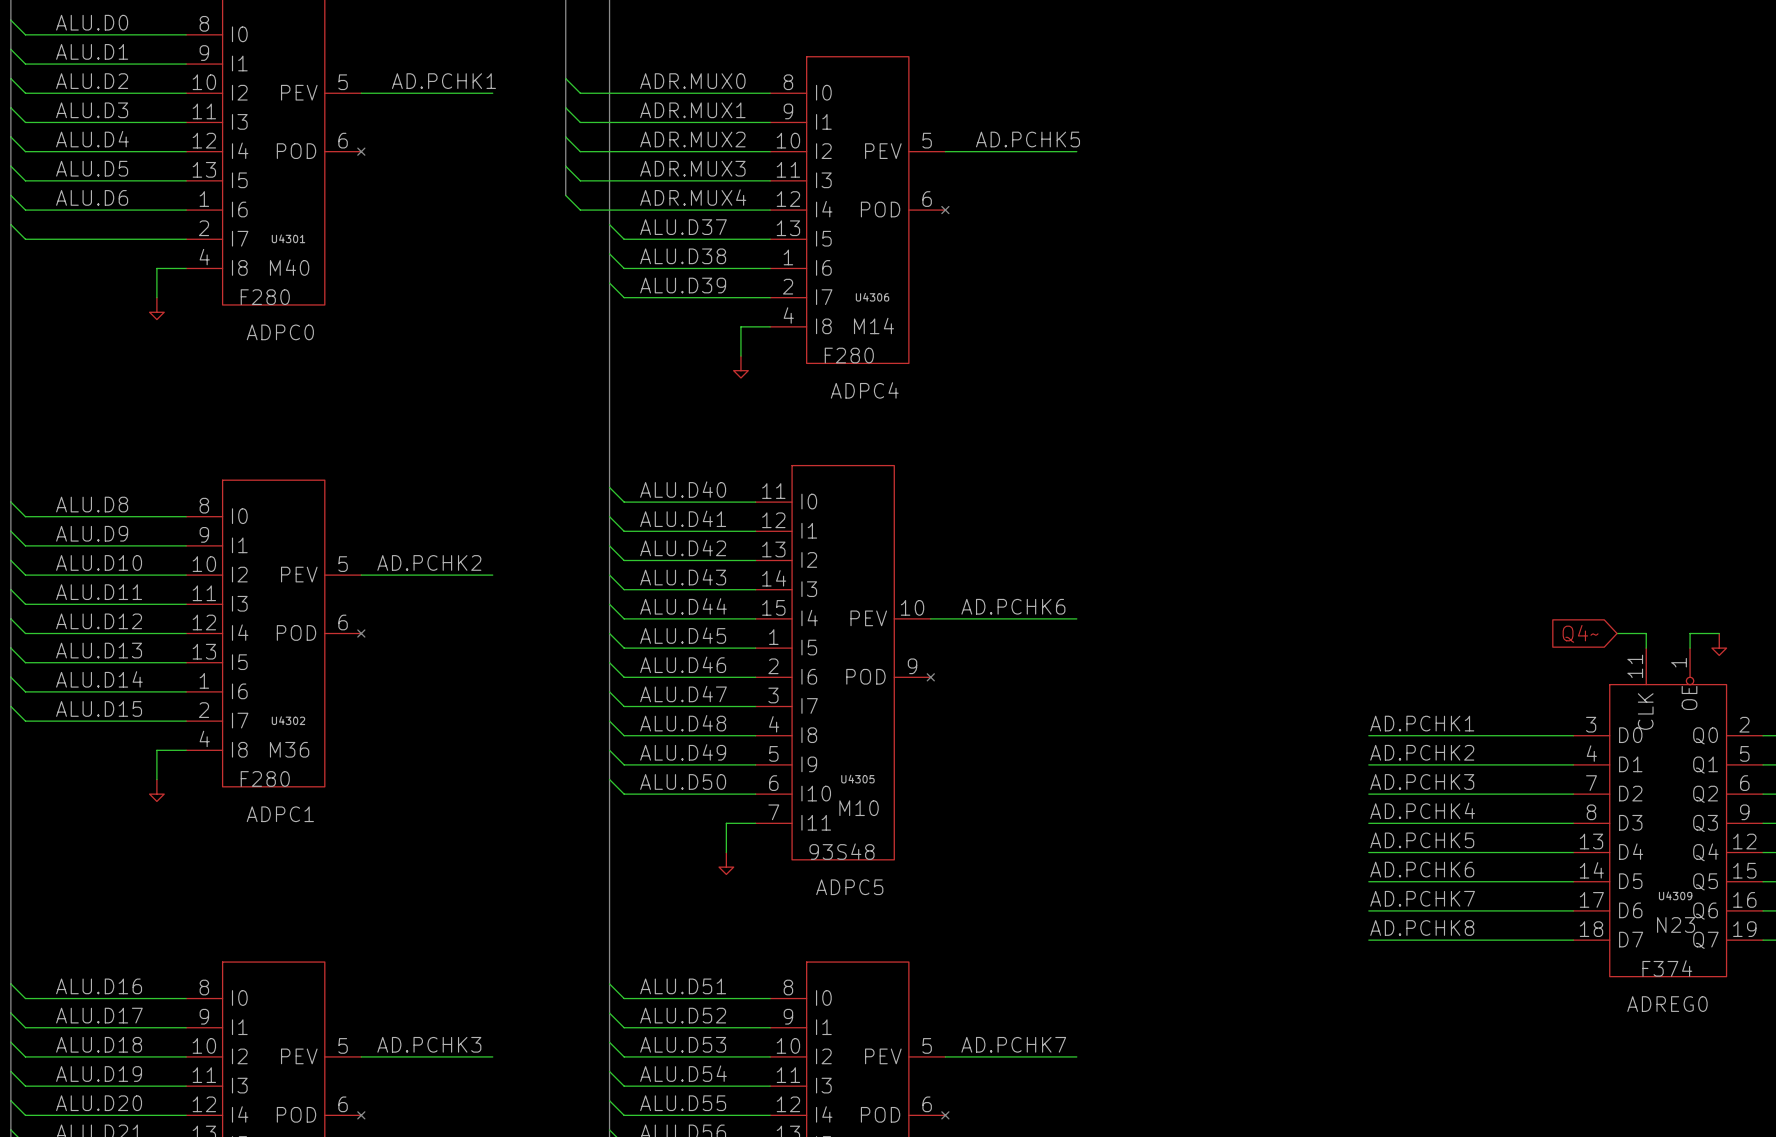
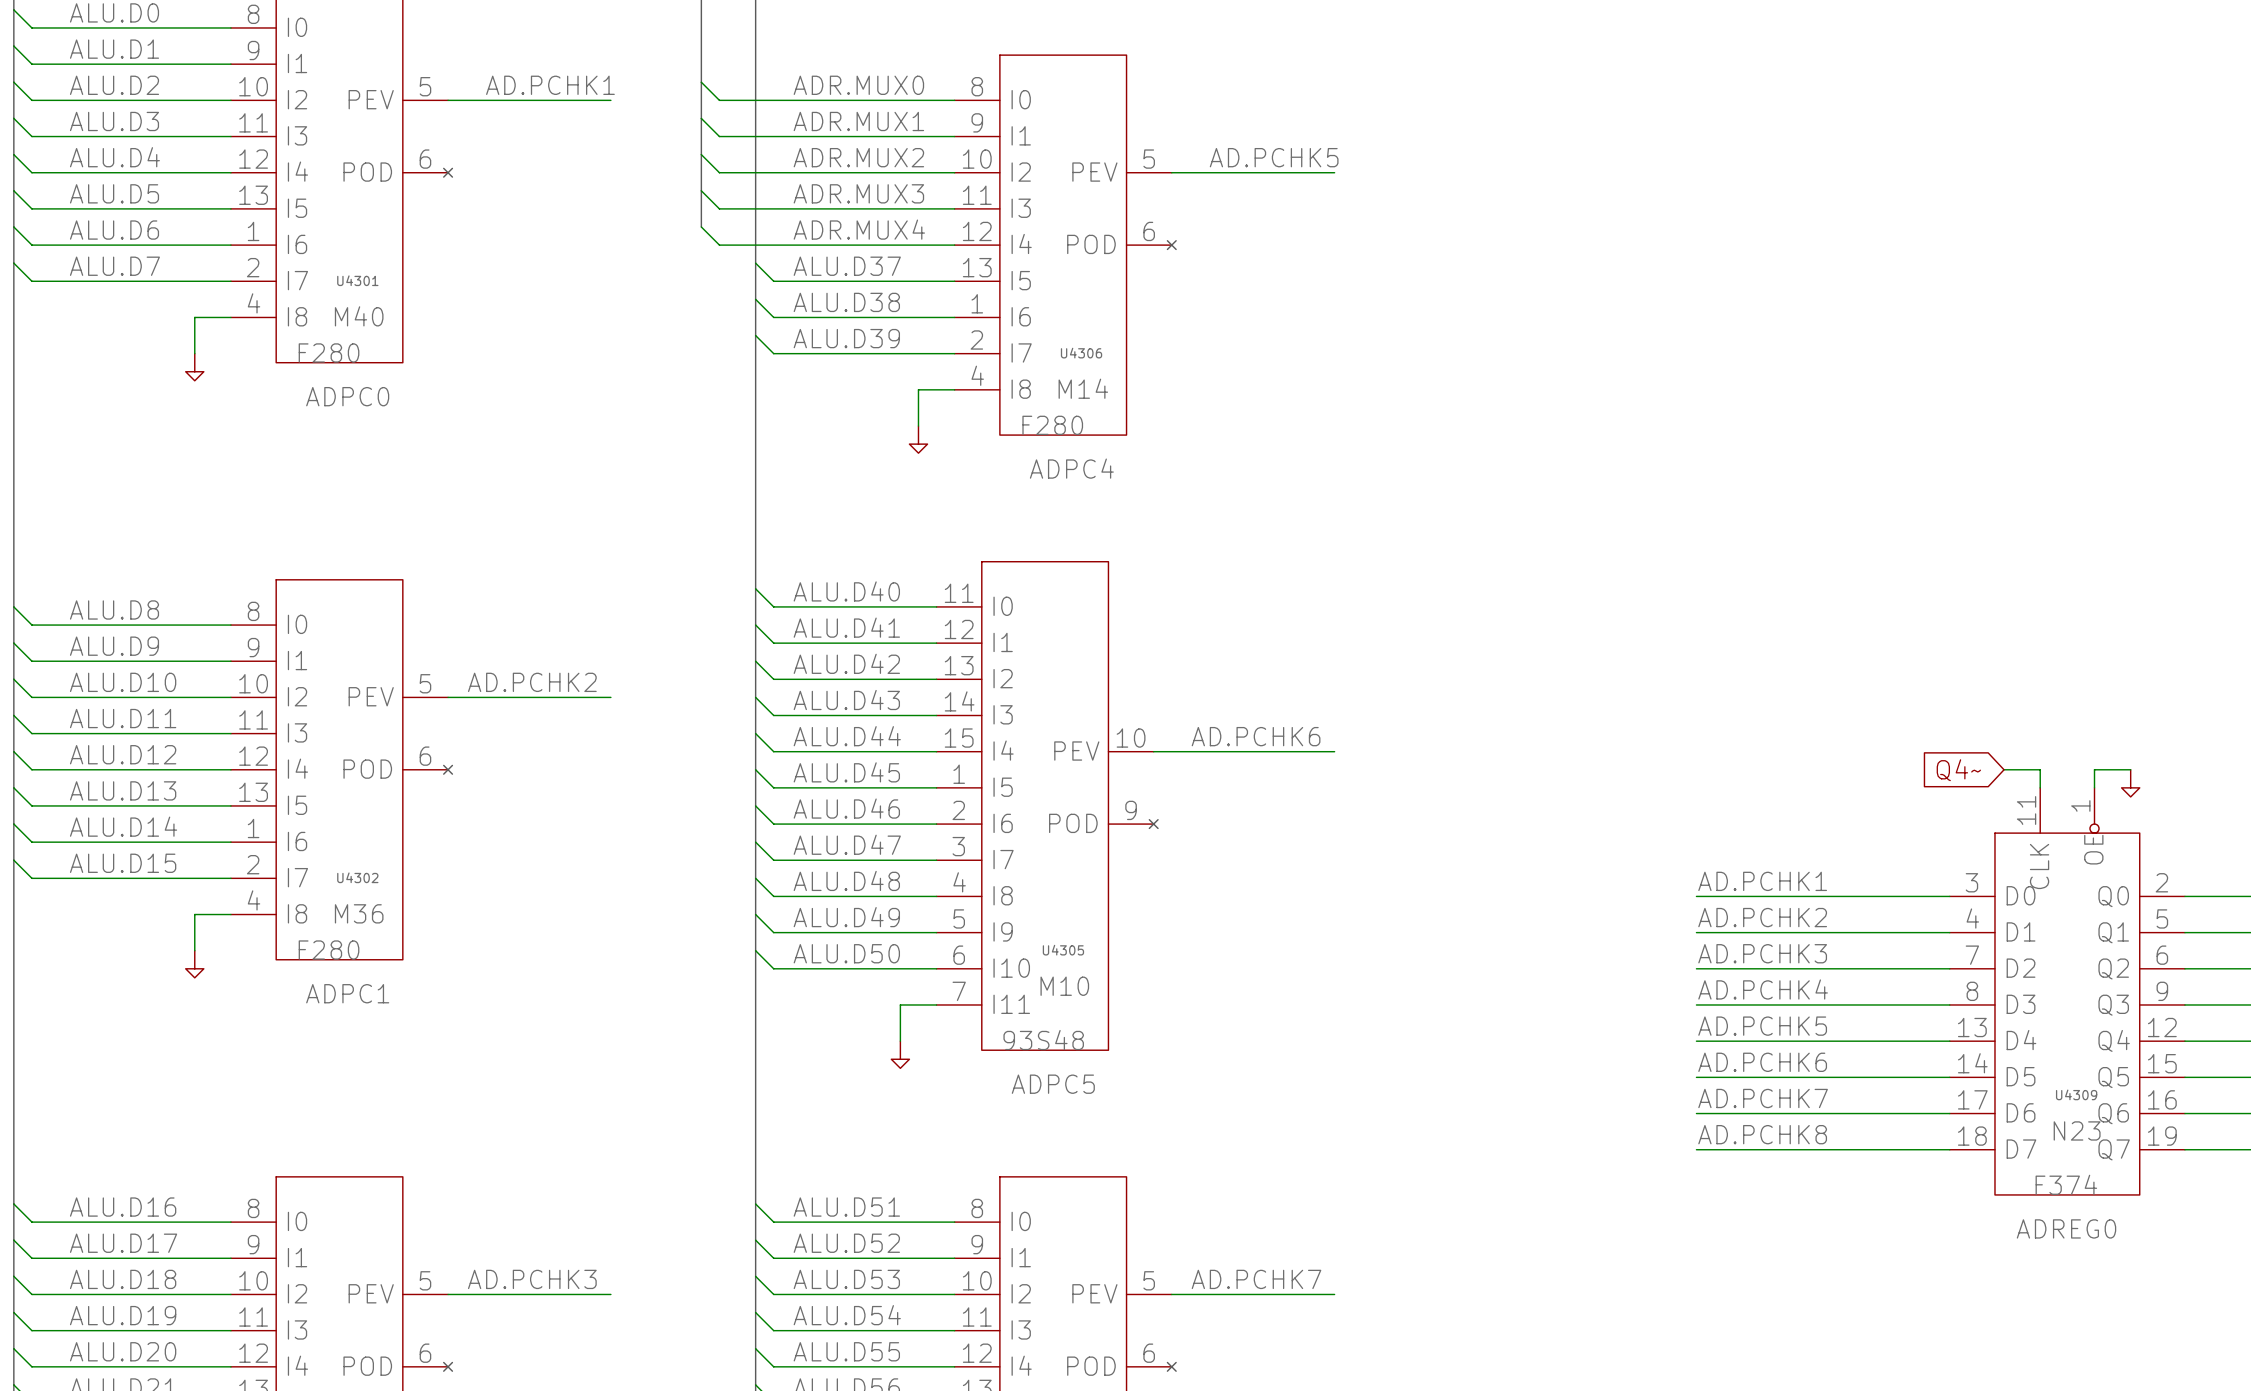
label: none -> ALU.D7 (114, 266)

